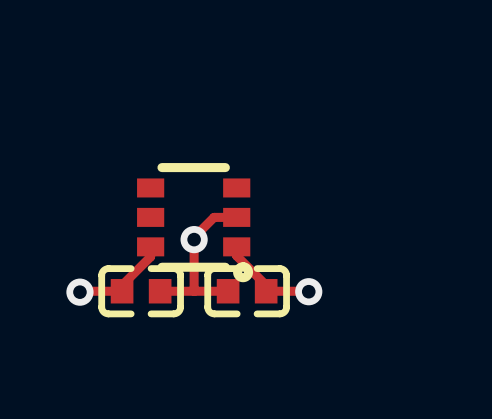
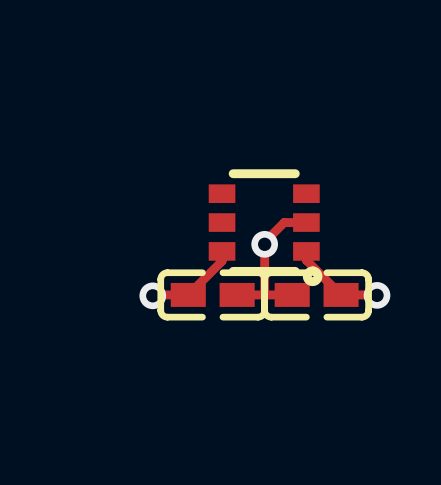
part footprint: [98, 265, 184, 318] -> [157, 269, 269, 321]
part footprint: [204, 265, 290, 318] -> [261, 269, 372, 321]

